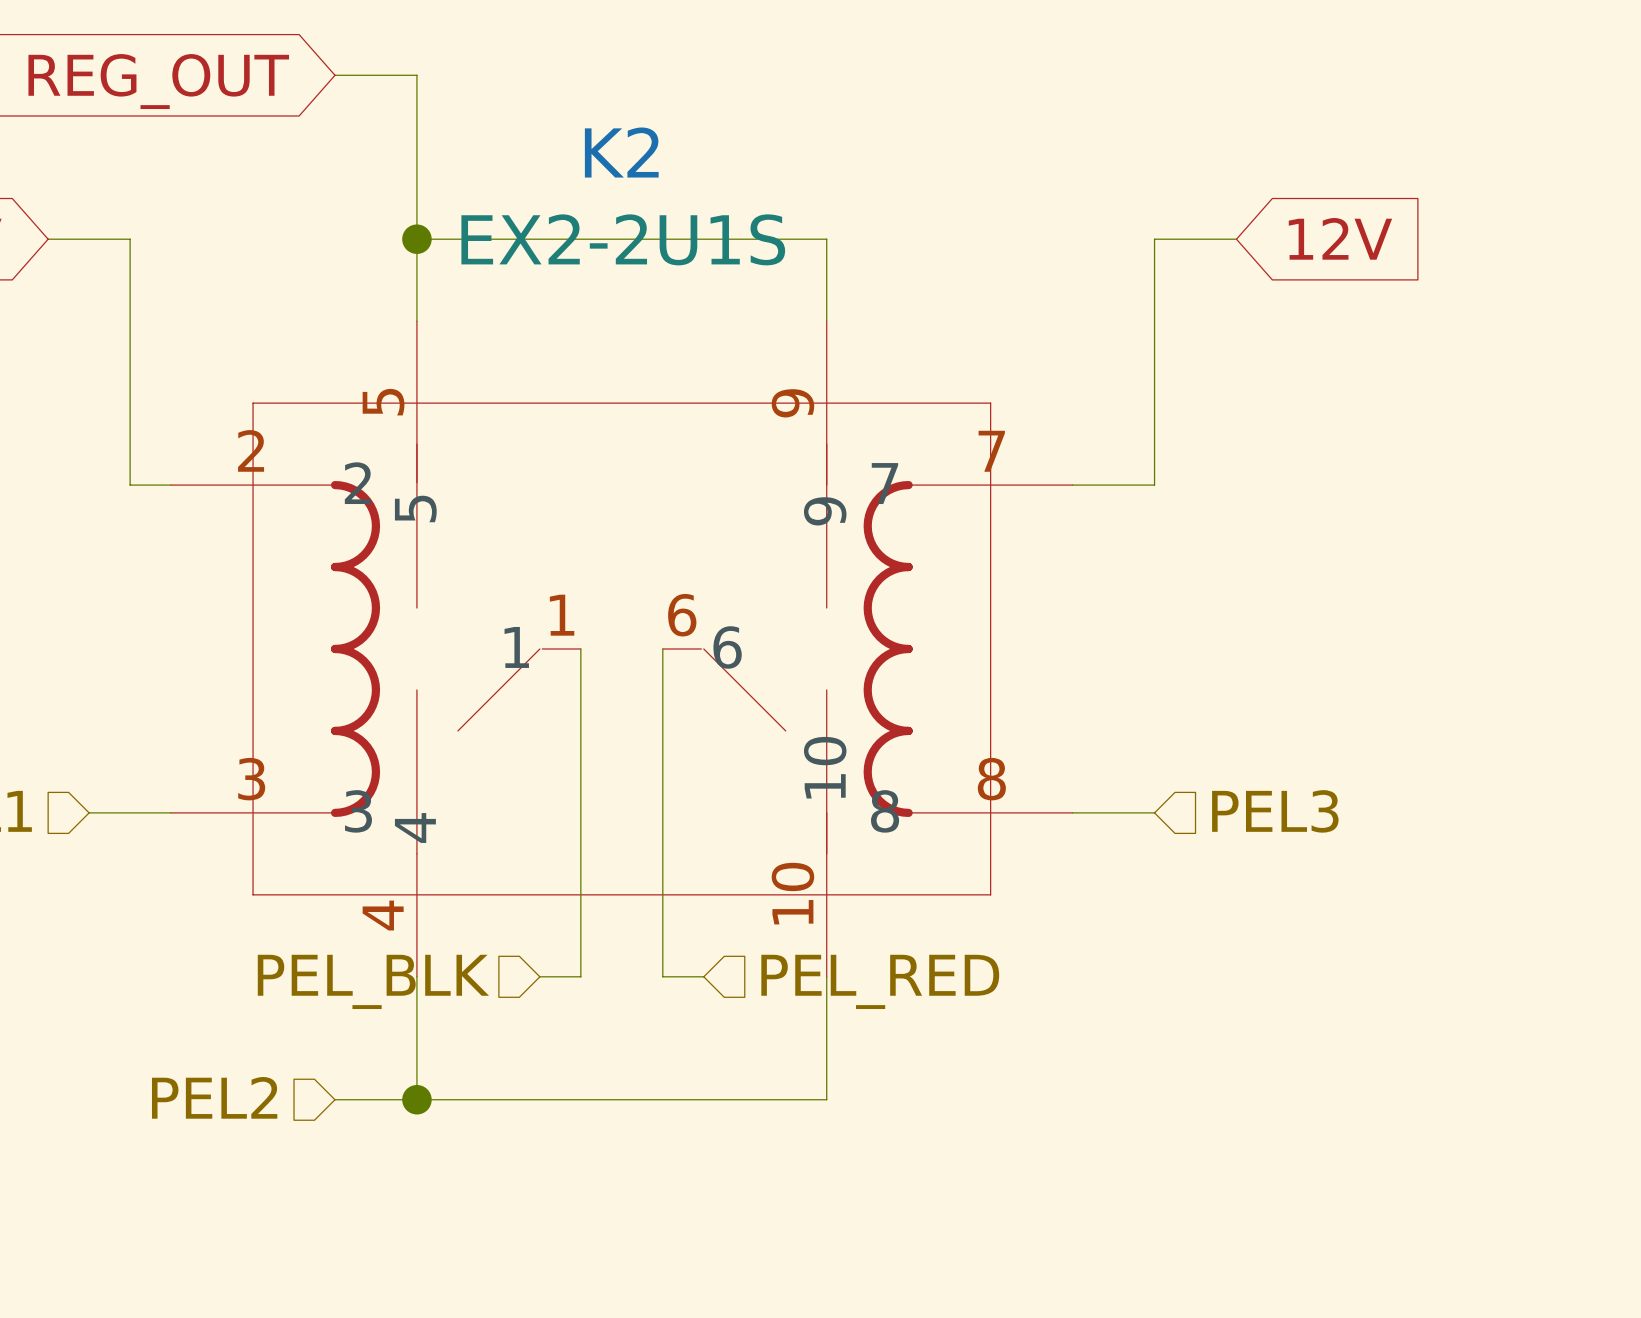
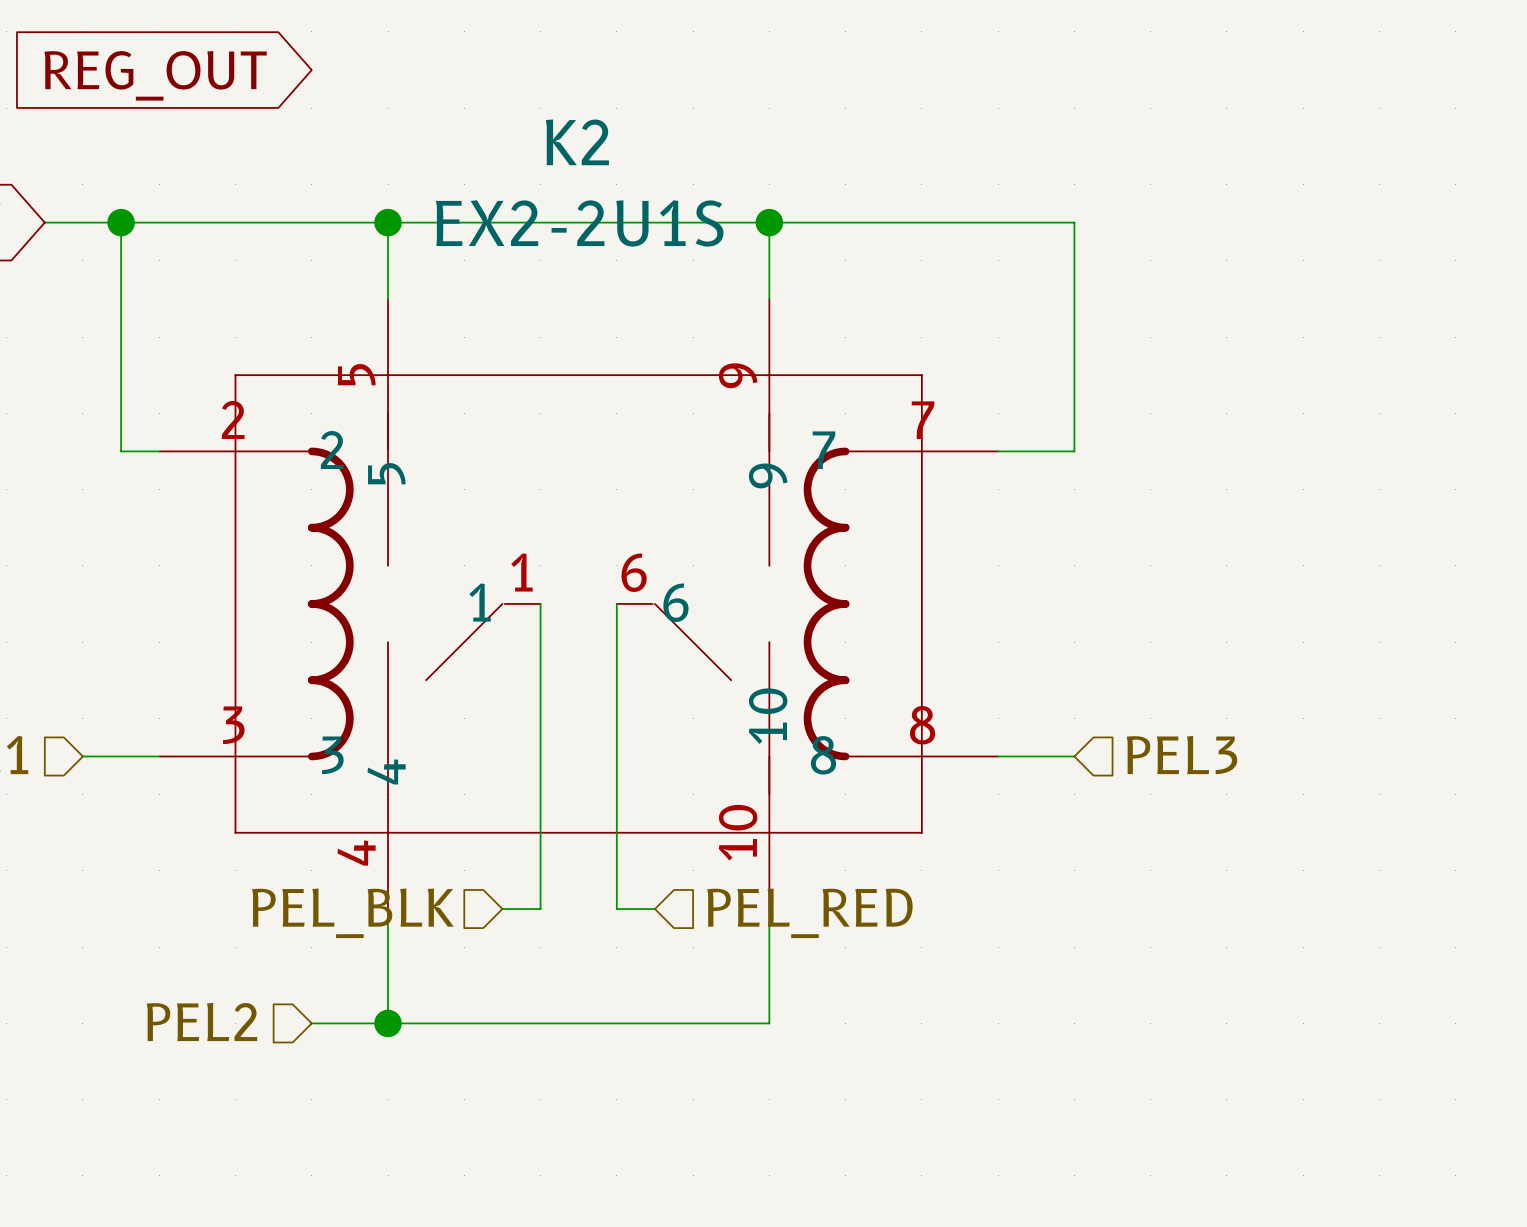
wire: (334, 75) (416, 75) (416, 239) -> (121, 222) (388, 222)
global label: 12V (1340, 238) -> none
junction: none -> (121, 222)
junction: none -> (769, 222)
wire: (1154, 239) (1236, 239) -> (1074, 222) (769, 222)

